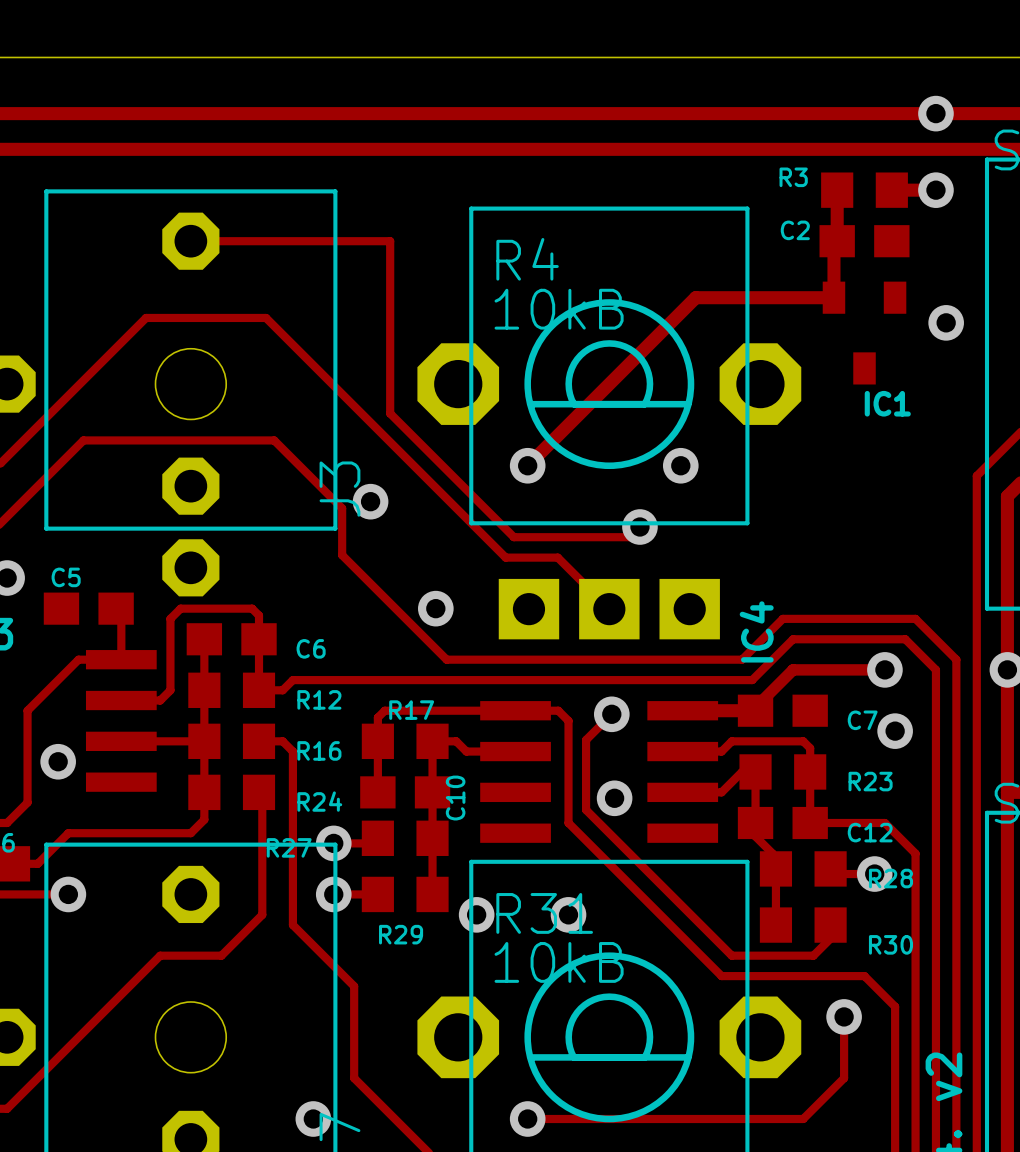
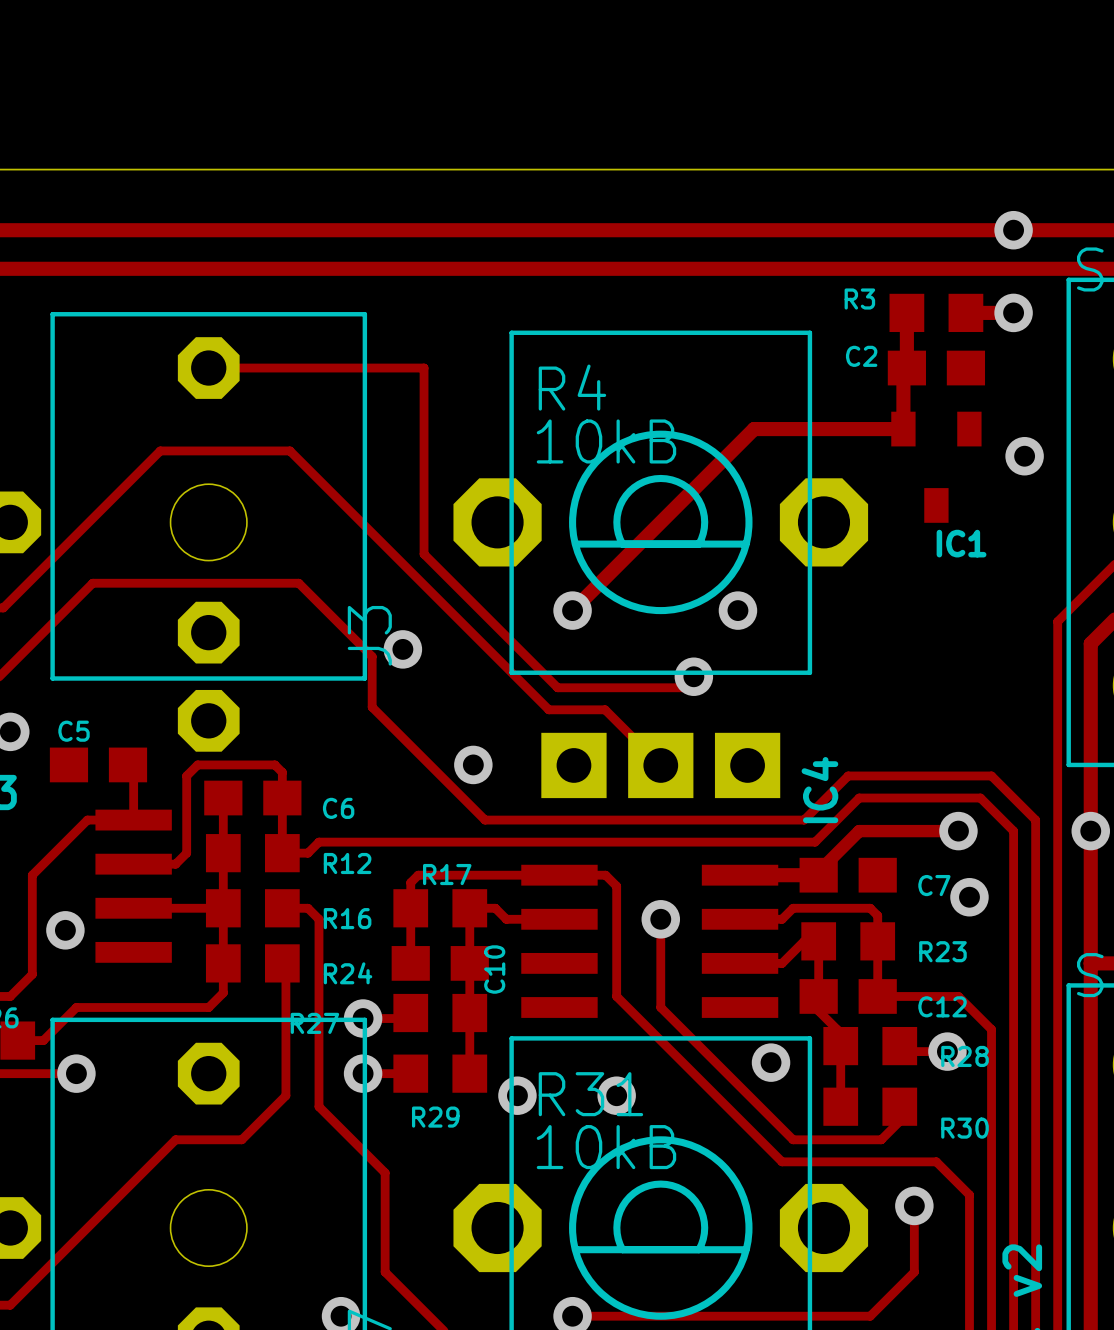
track: (611, 714) (586, 740) (586, 809) (609, 833) -> (660, 919) (660, 1007)
via: (611, 714) -> none
via: none -> (660, 919)
via: (614, 798) -> none
via: none -> (771, 1062)

